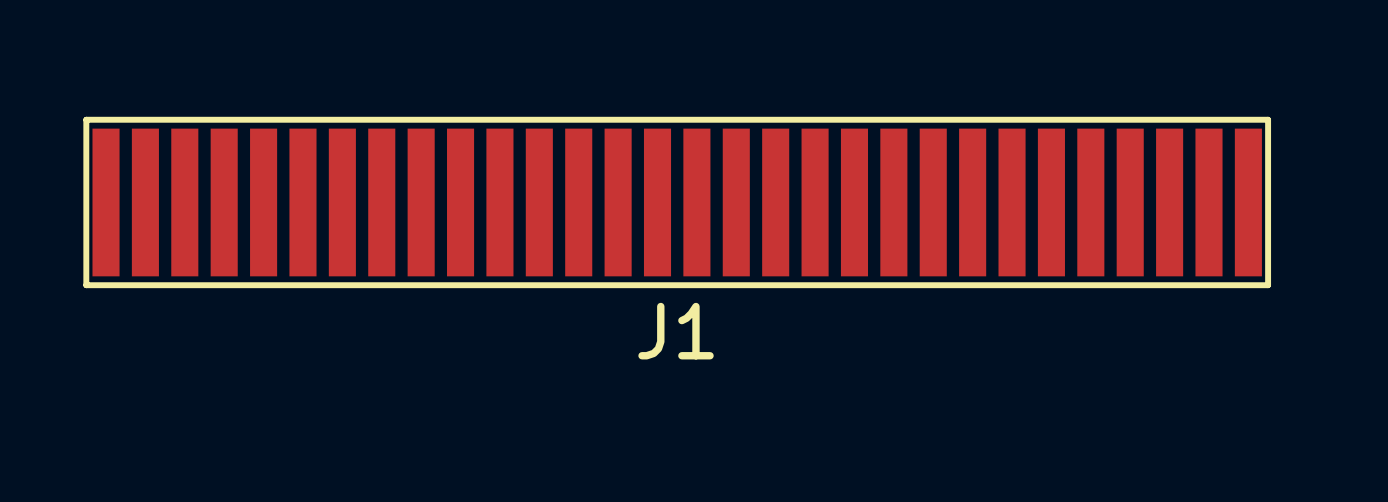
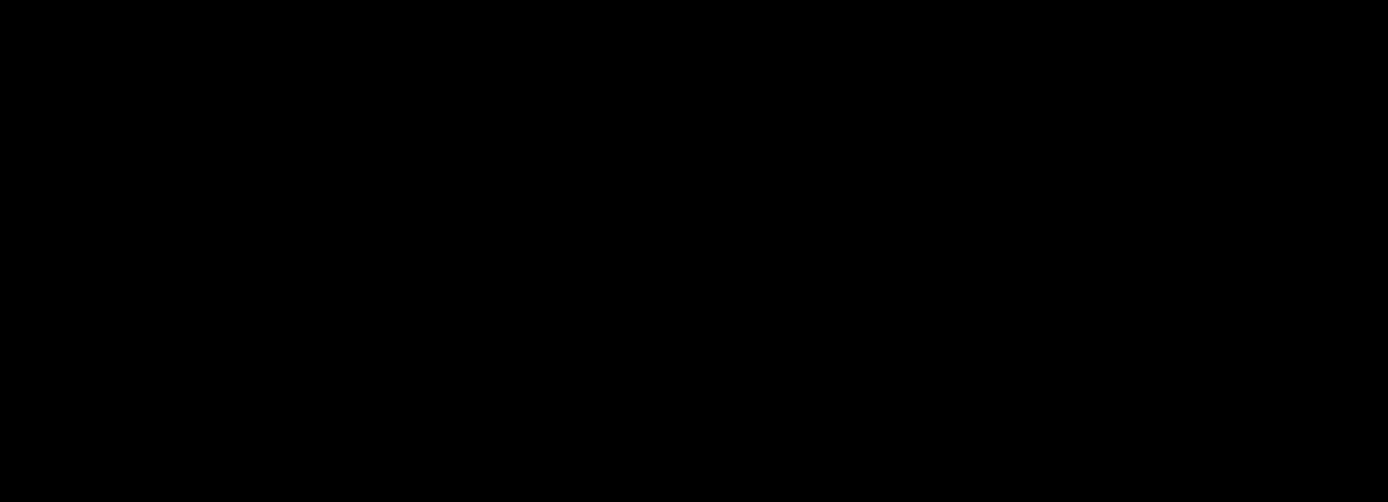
J1: (677, 202) -> none

